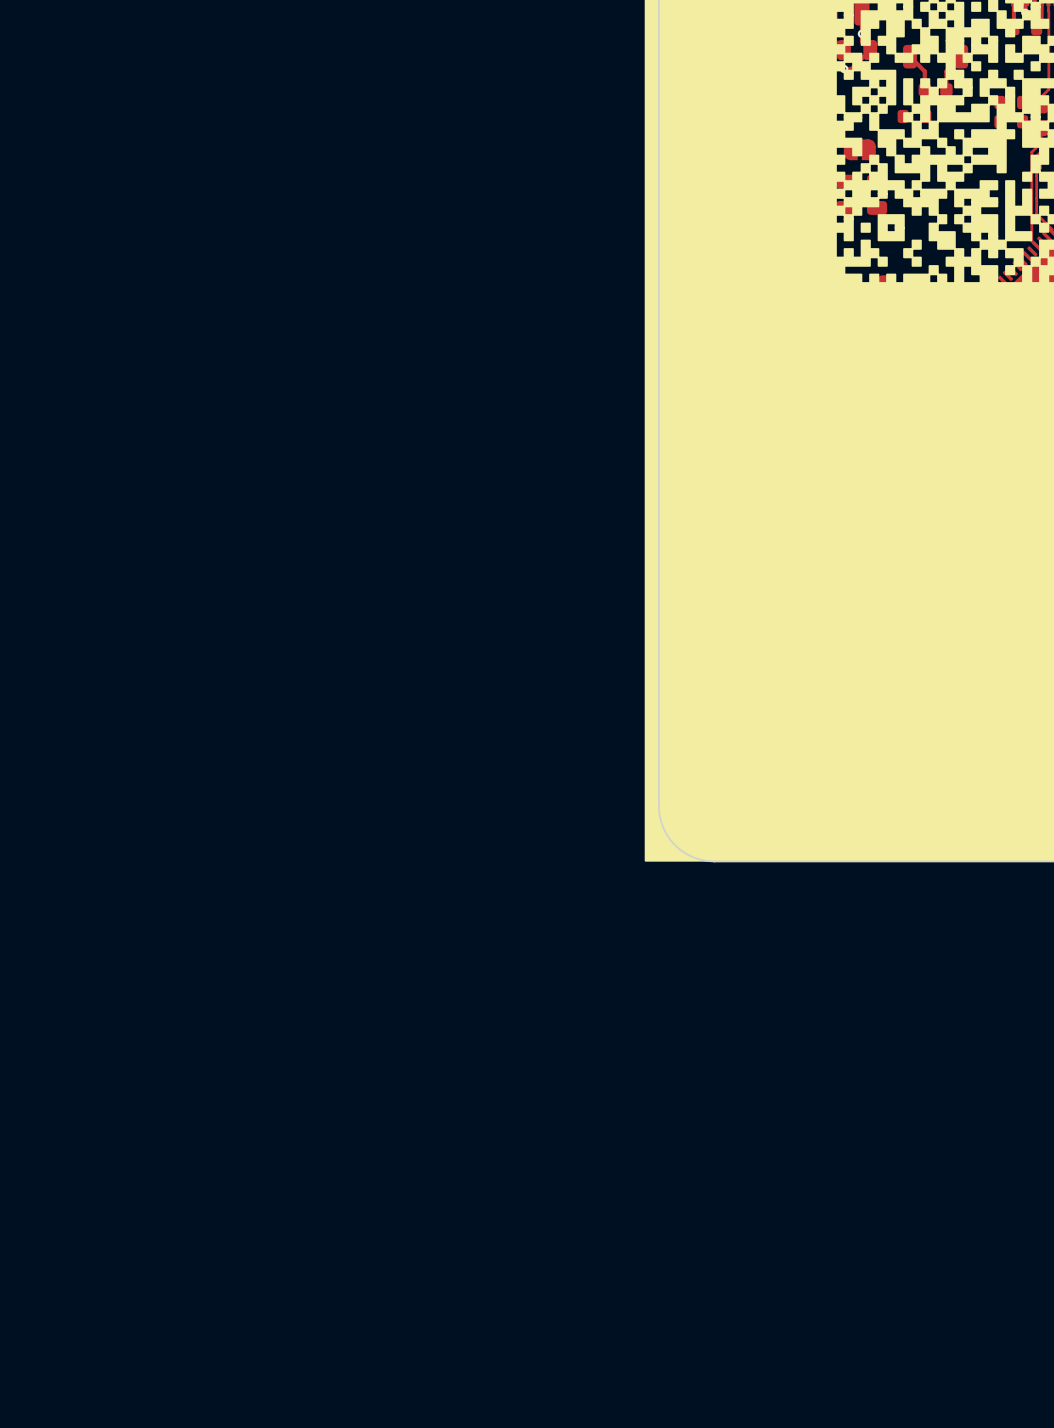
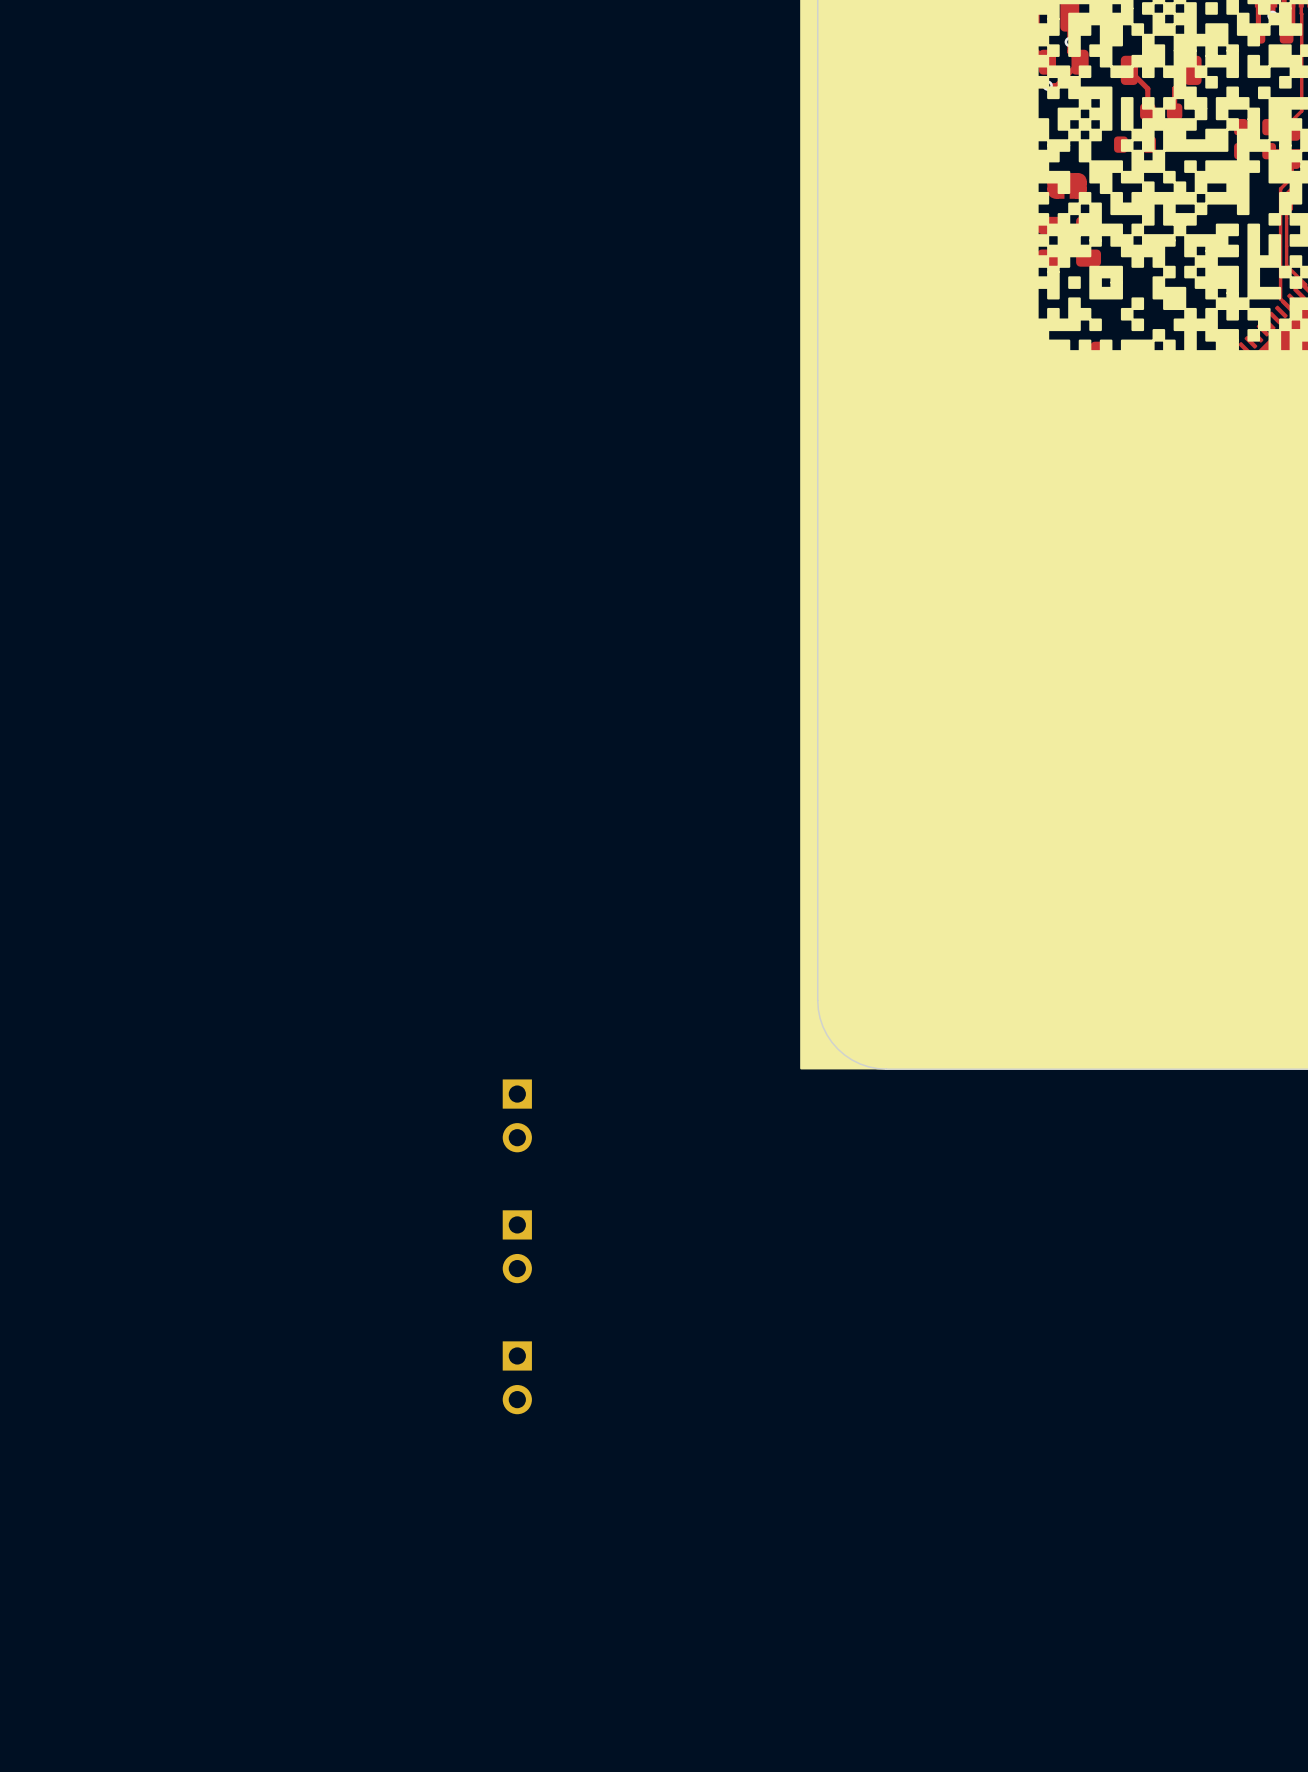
part: none -> (517, 1115)
part: none -> (517, 1246)
part: none -> (517, 1377)

